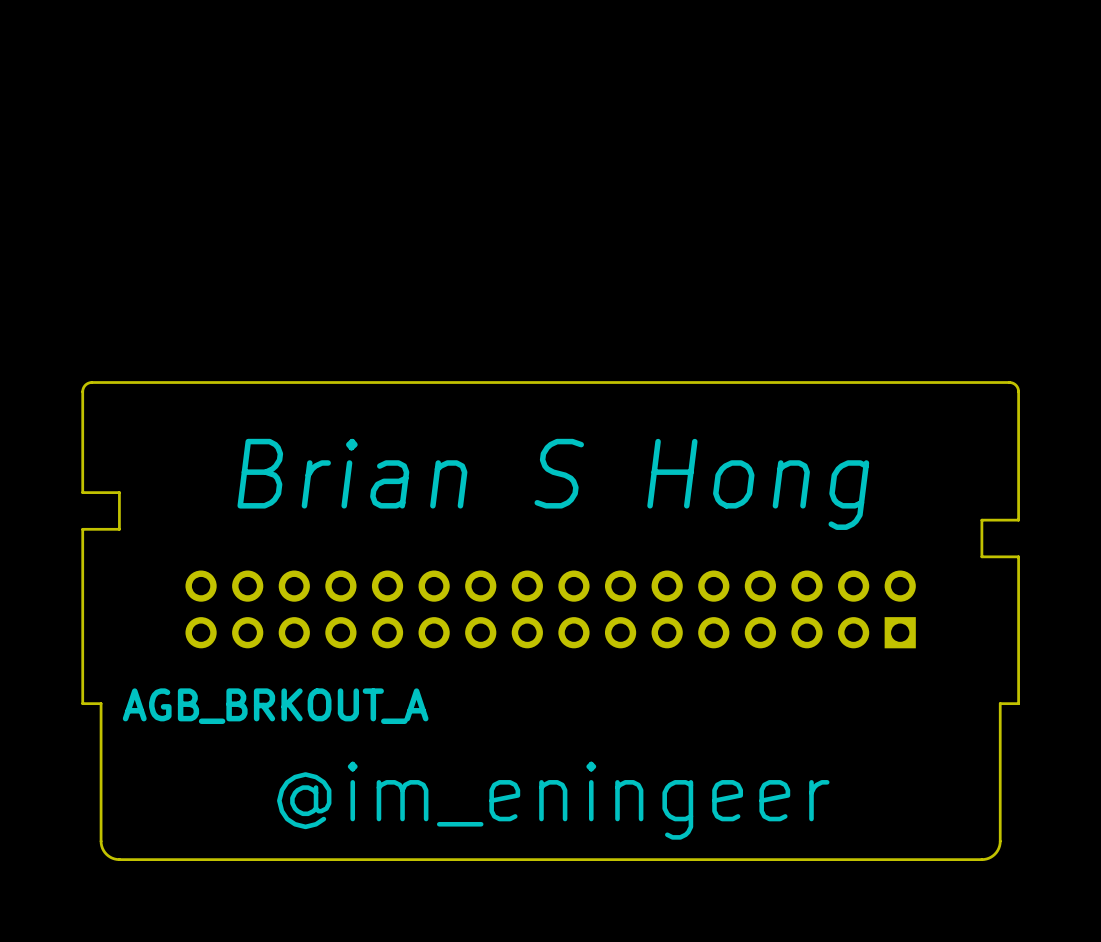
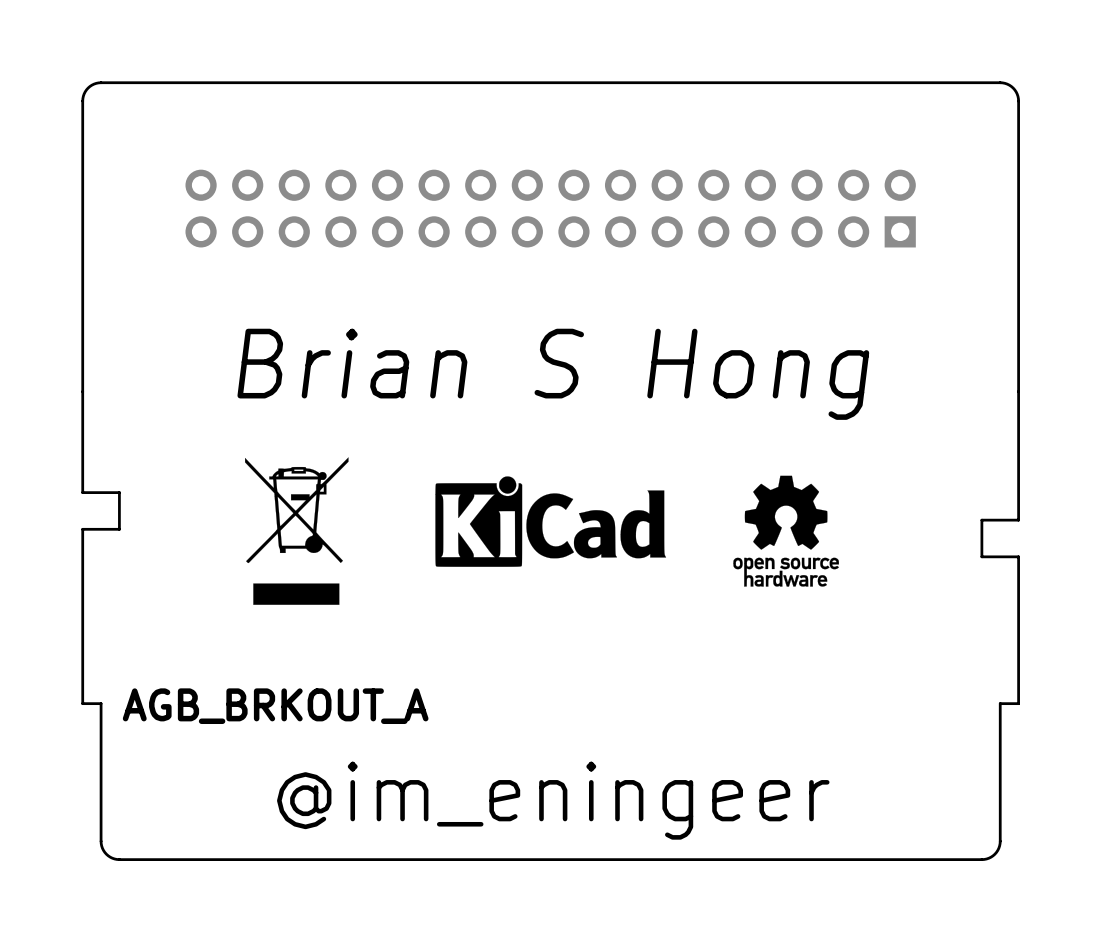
part footprint: [81, 381, 1020, 861] -> [81, 390, 1020, 861]
board edge: none -> (1018, 391) (1018, 101) (1013, 88) (1000, 82) (96, 83) (86, 89) (82, 101) (82, 391)
drawing: none -> [245, 457, 349, 605]
drawing: none -> [733, 475, 839, 587]
drawing: none -> [435, 476, 667, 567]
text position: Brian S Hong (553, 484) -> Brian S Hong (553, 374)
part position: (550, 609) -> (550, 208)

